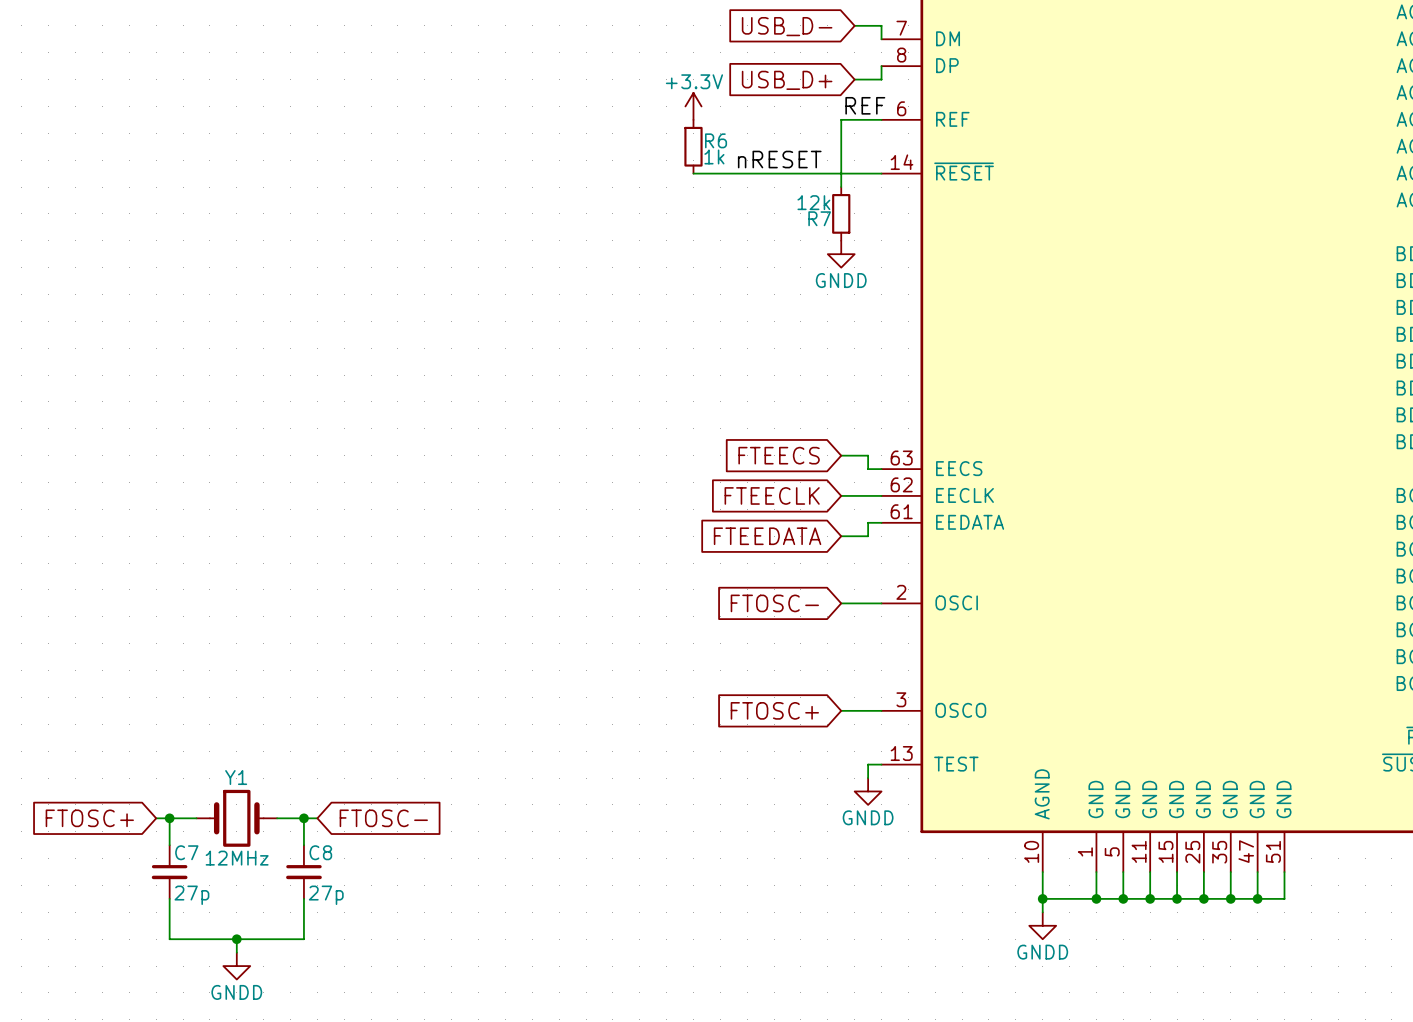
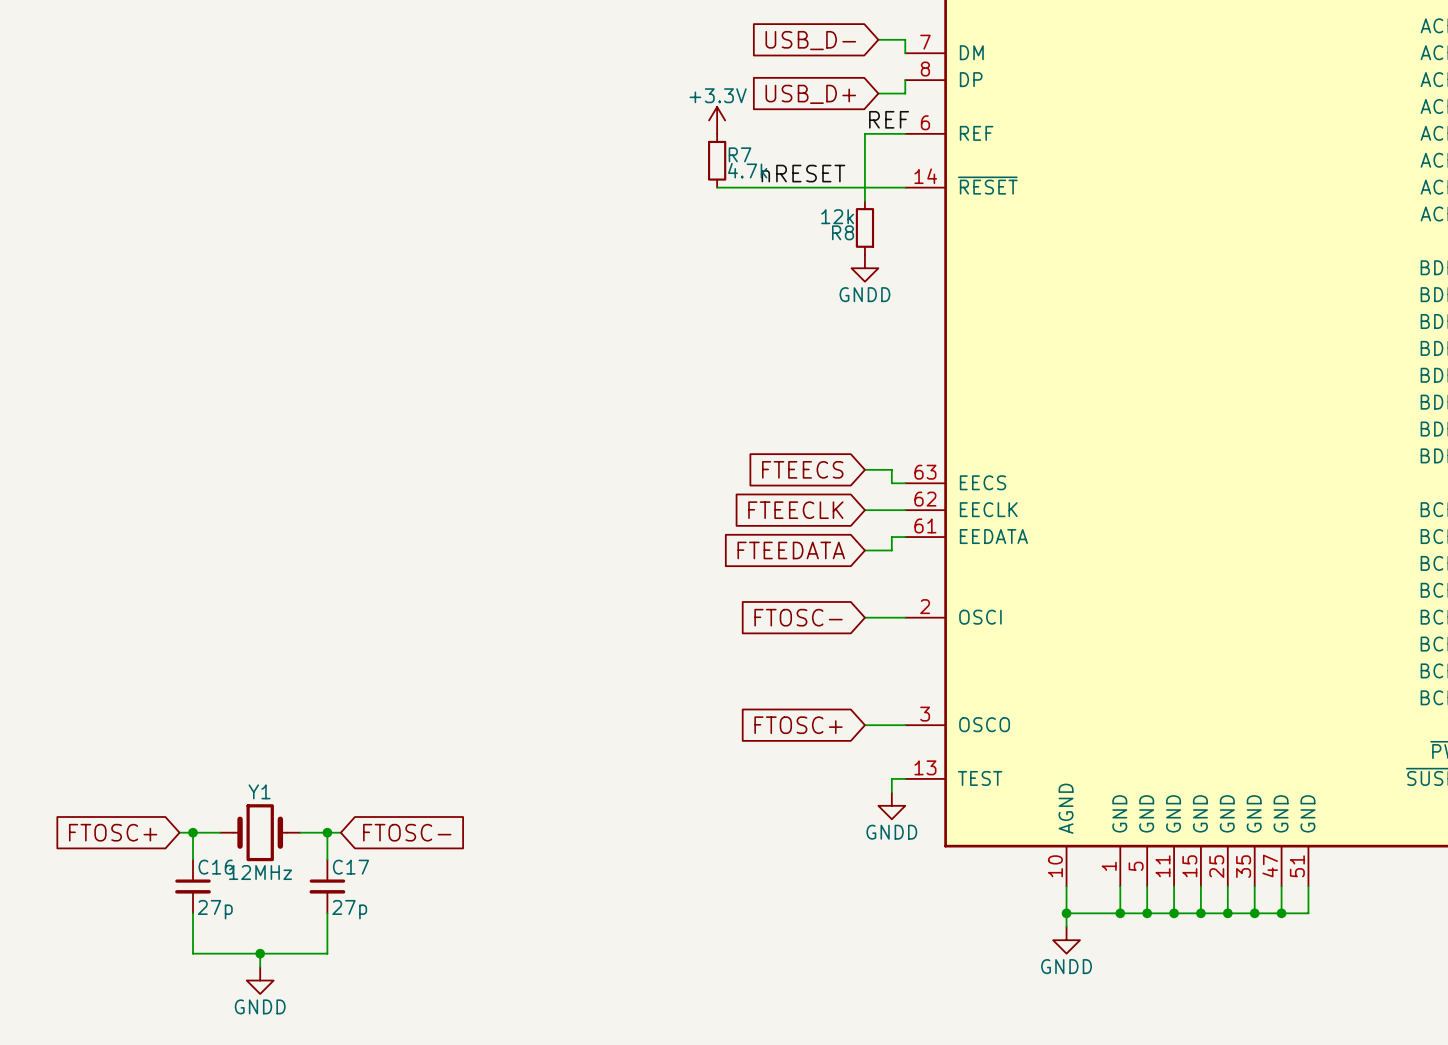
R6 name: R6 (716, 140) -> R7 (740, 154)
R6 value: 1k (714, 156) -> 4.7k (747, 170)
R7 name: R7 (819, 218) -> R8 (843, 232)
C7 name: C7 (186, 852) -> C16 (216, 867)
C8 name: C8 (320, 852) -> C17 (350, 867)

